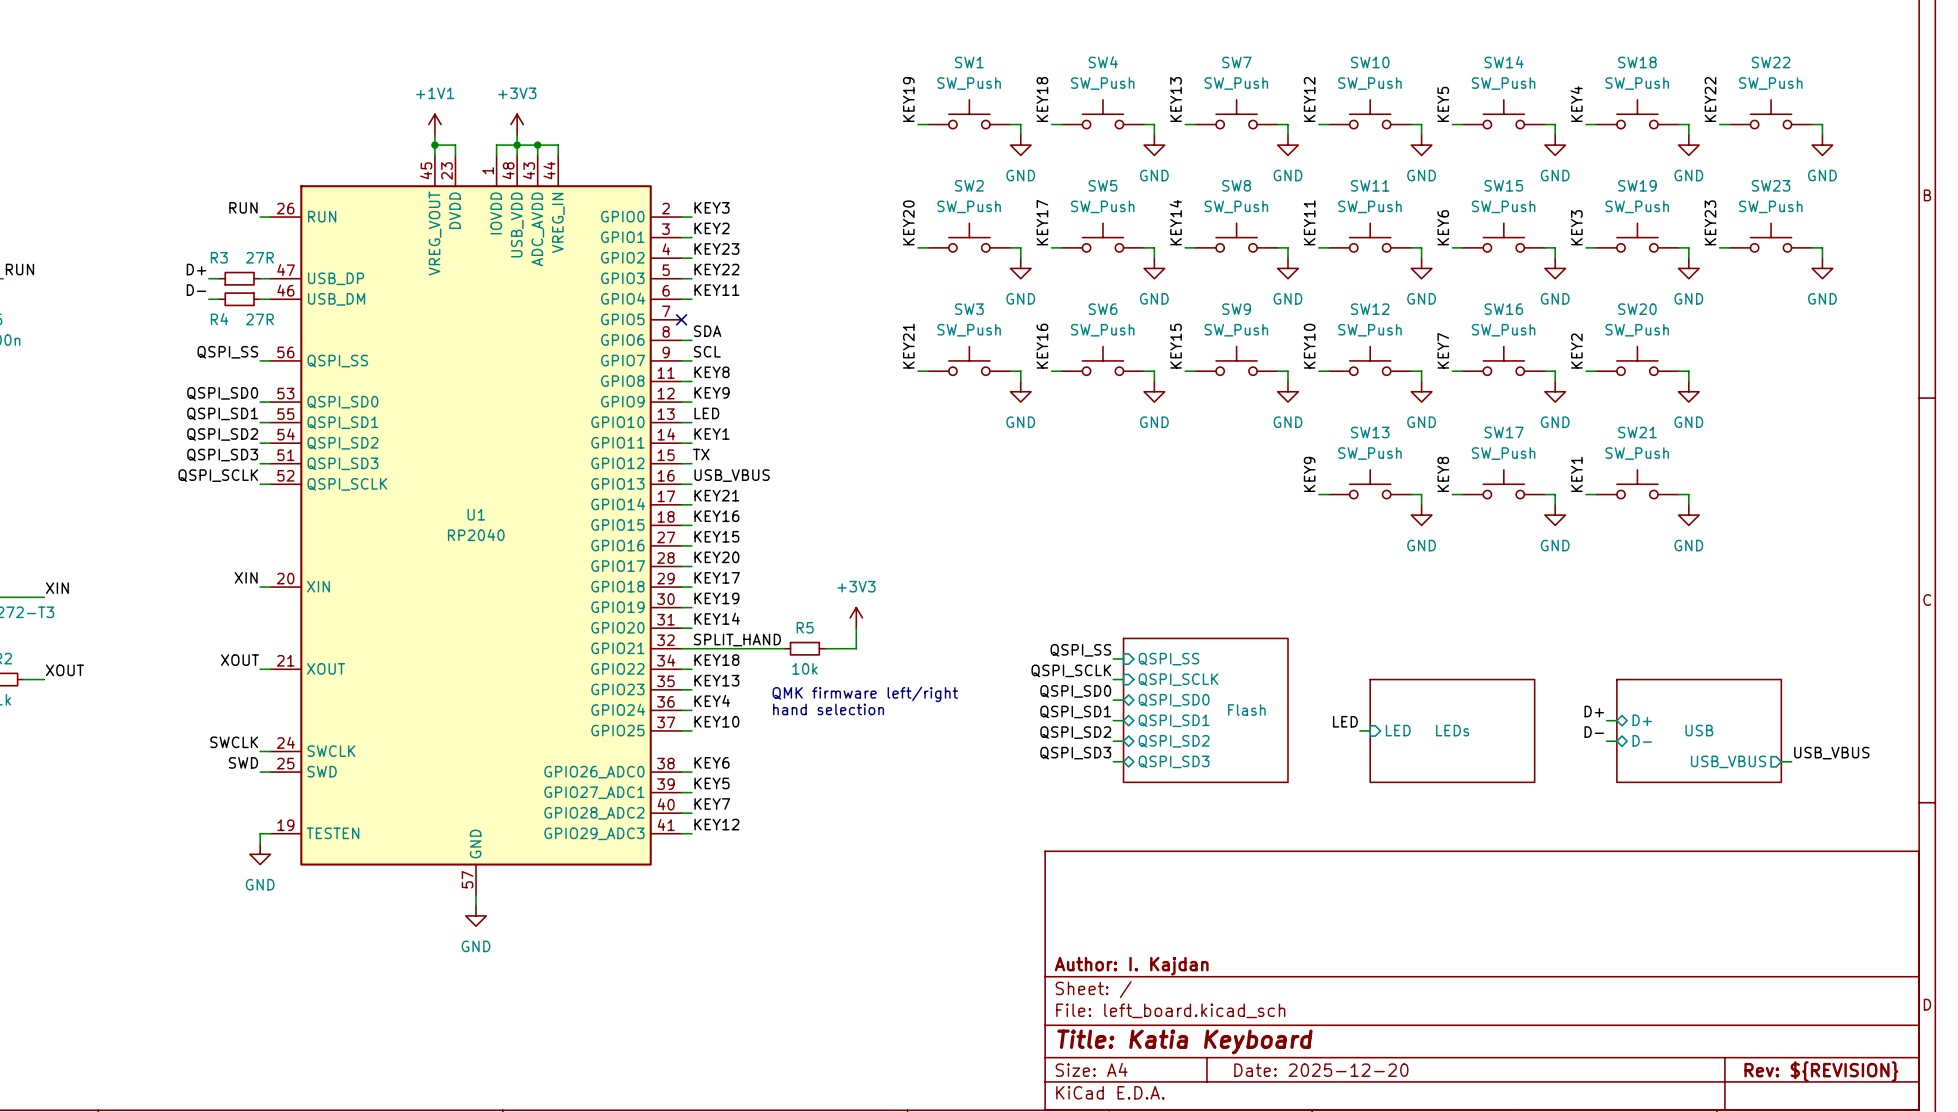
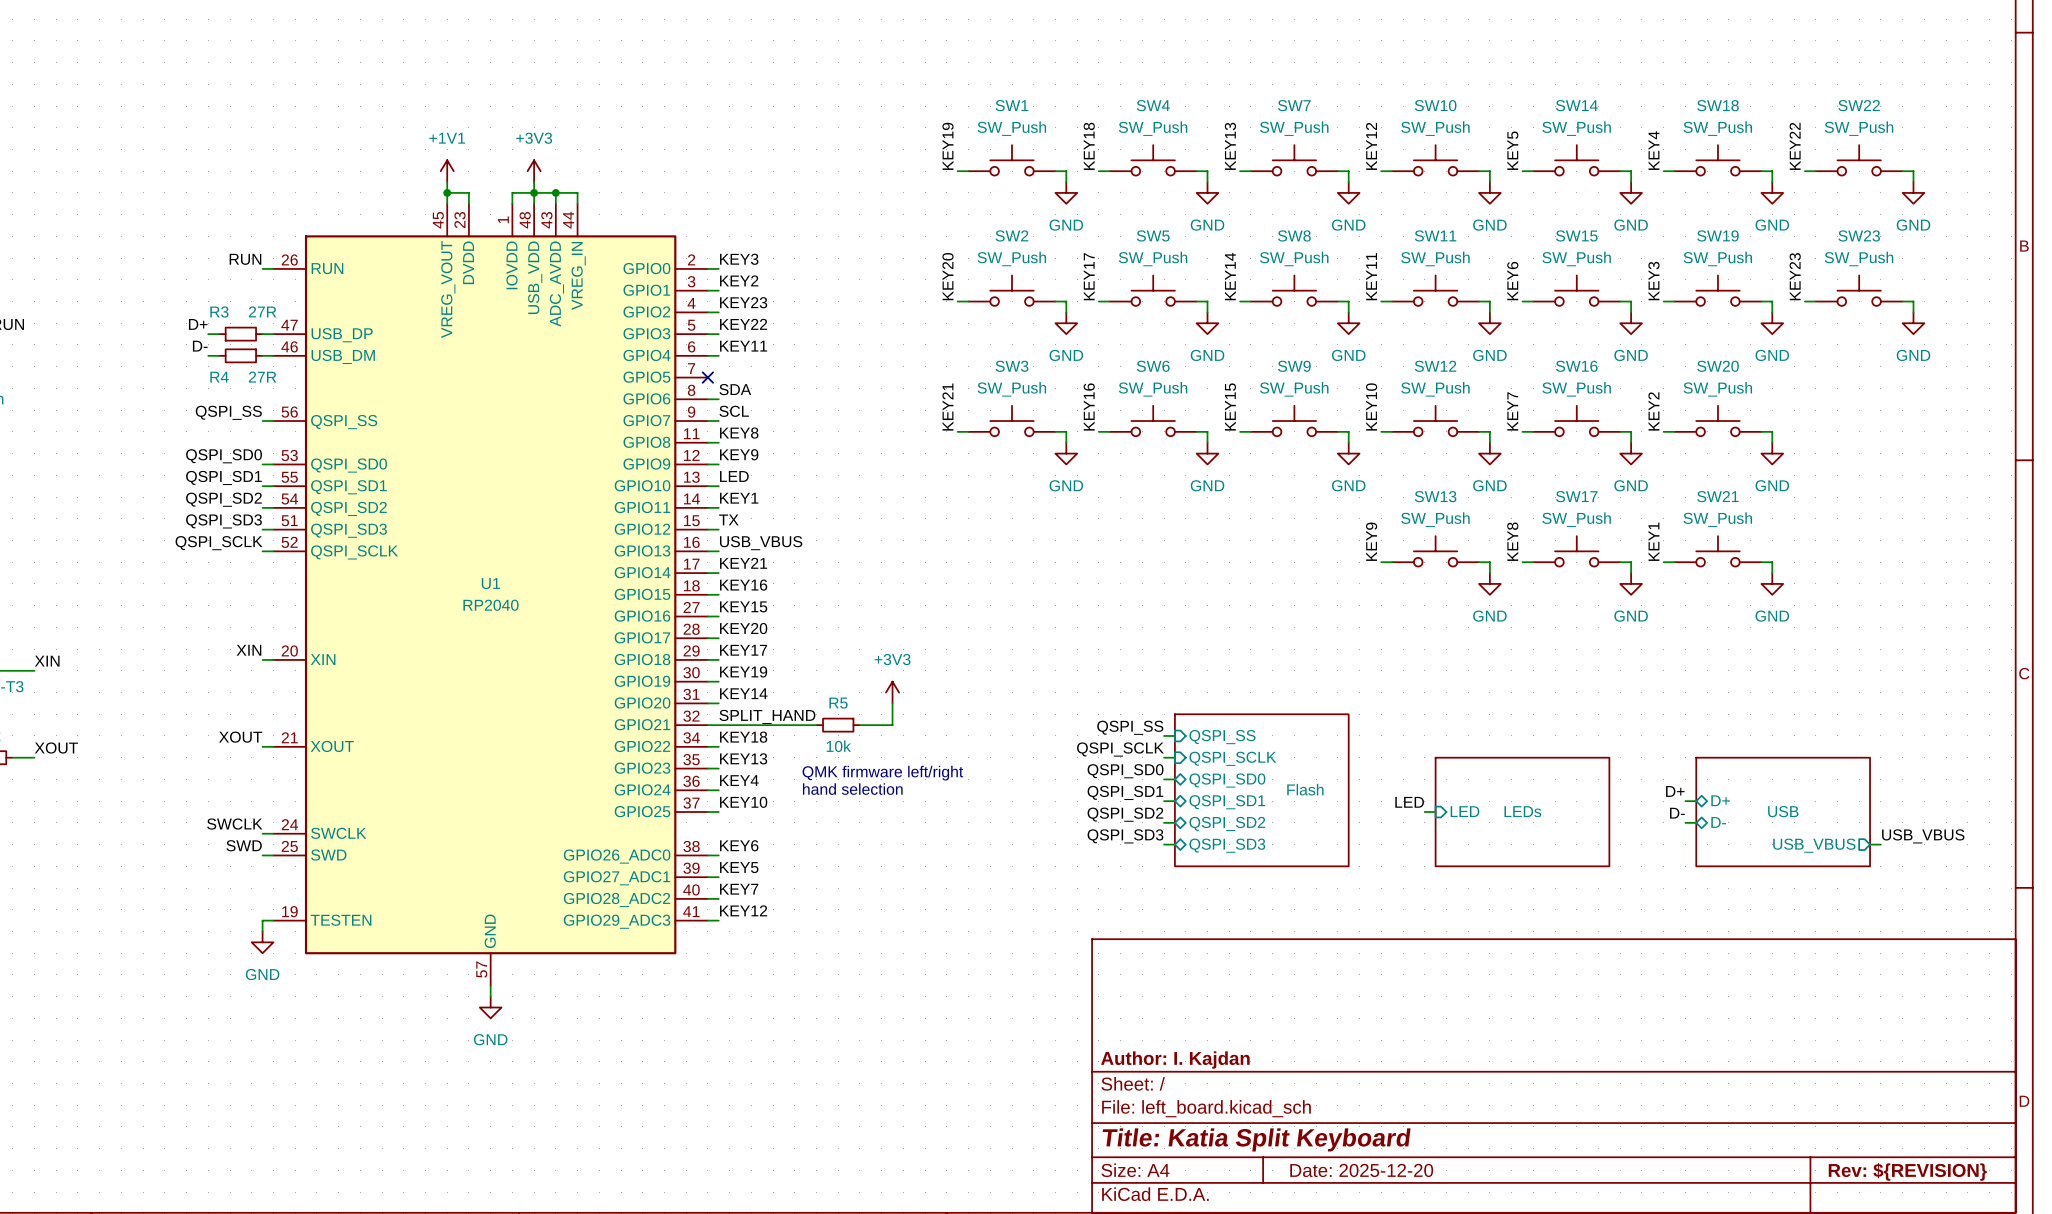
title block: Title: Katia Keyboard (1184, 1041) -> Title: Katia Split Keyboard (1256, 1139)

